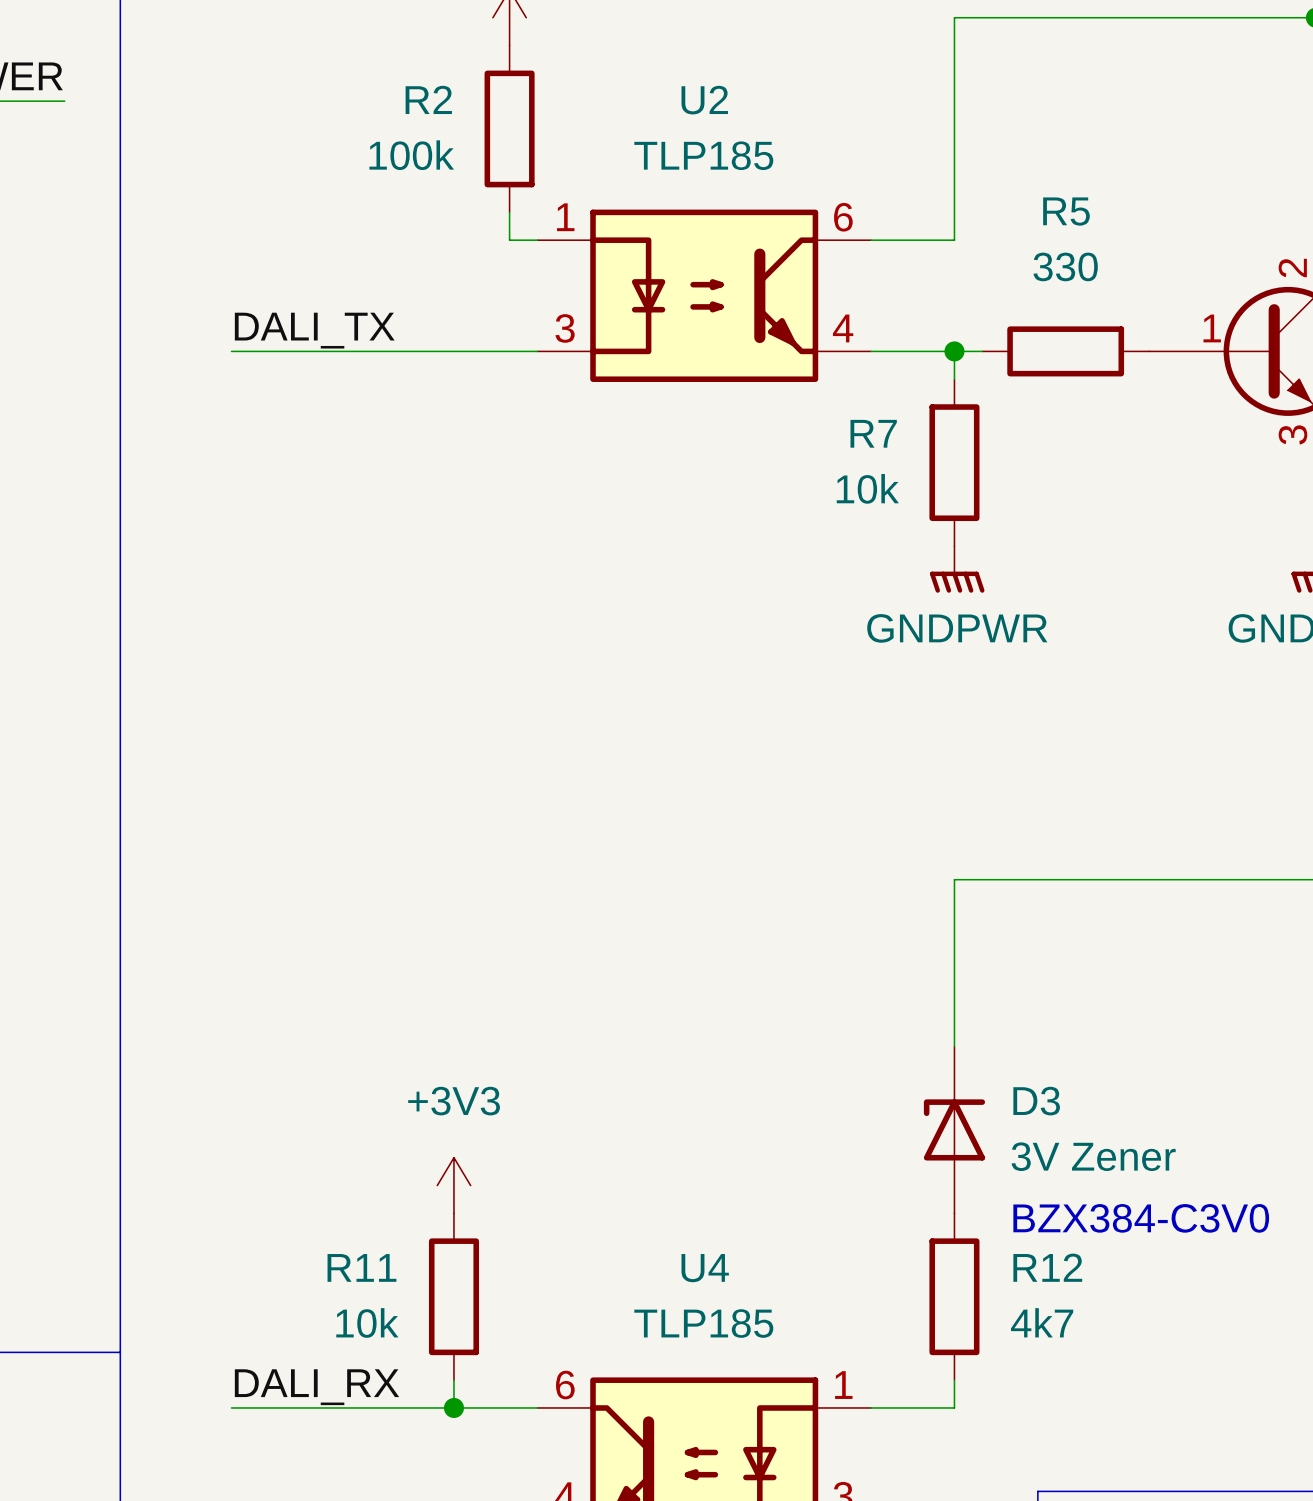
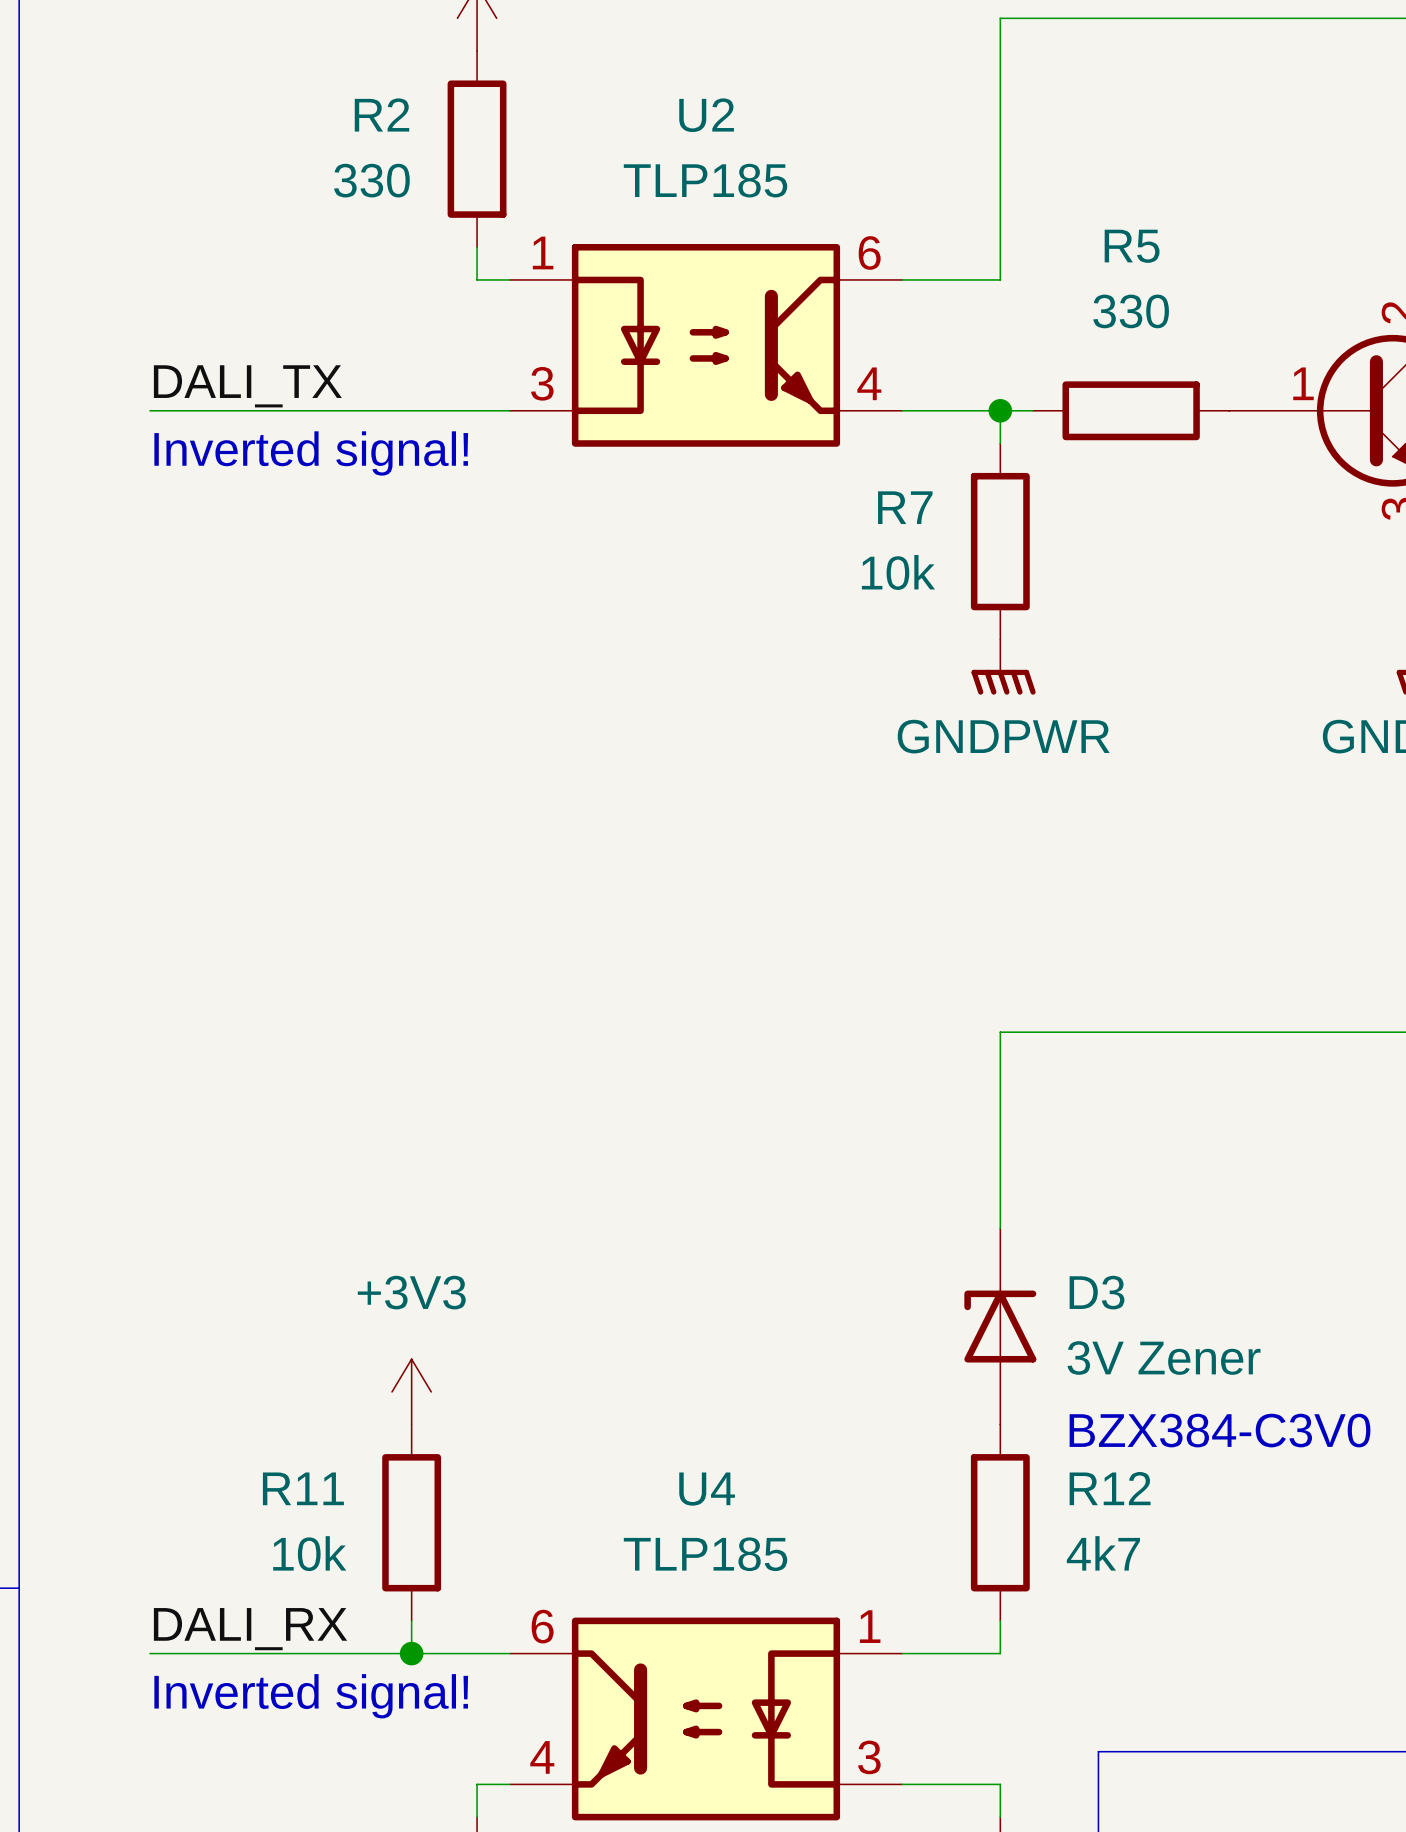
R2 value: 100k (411, 155) -> 330 (371, 180)
text: none -> Inverted signal! (311, 453)
text: none -> Inverted signal! (311, 1696)

